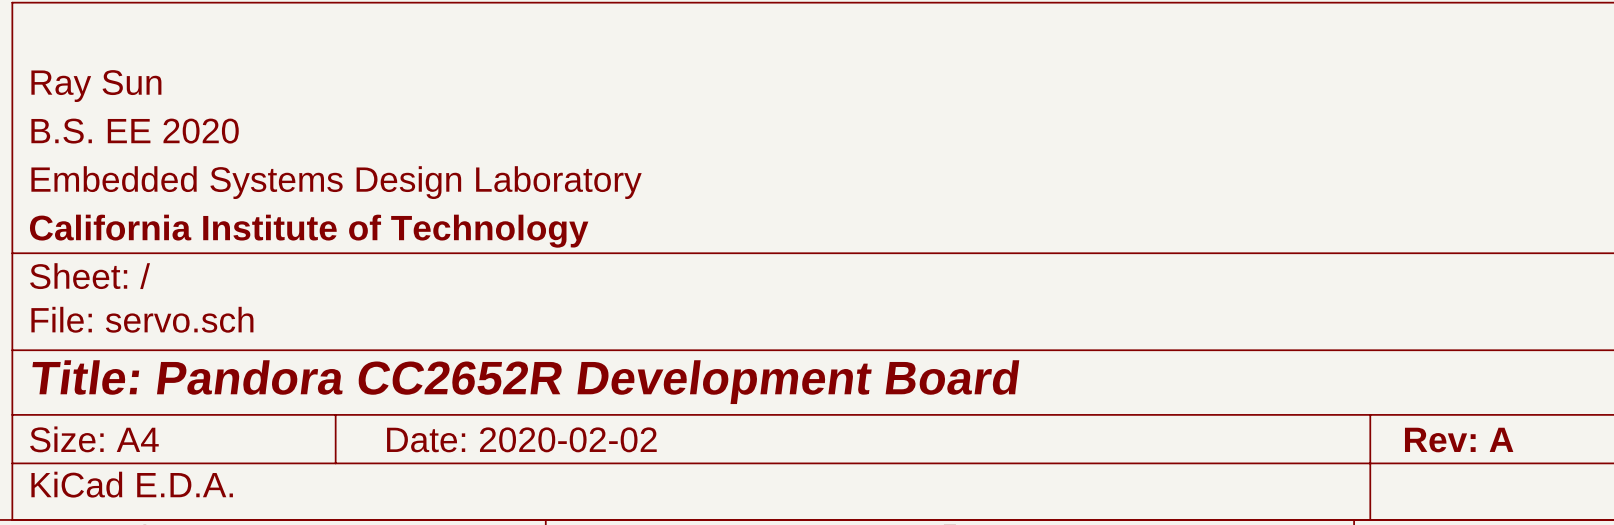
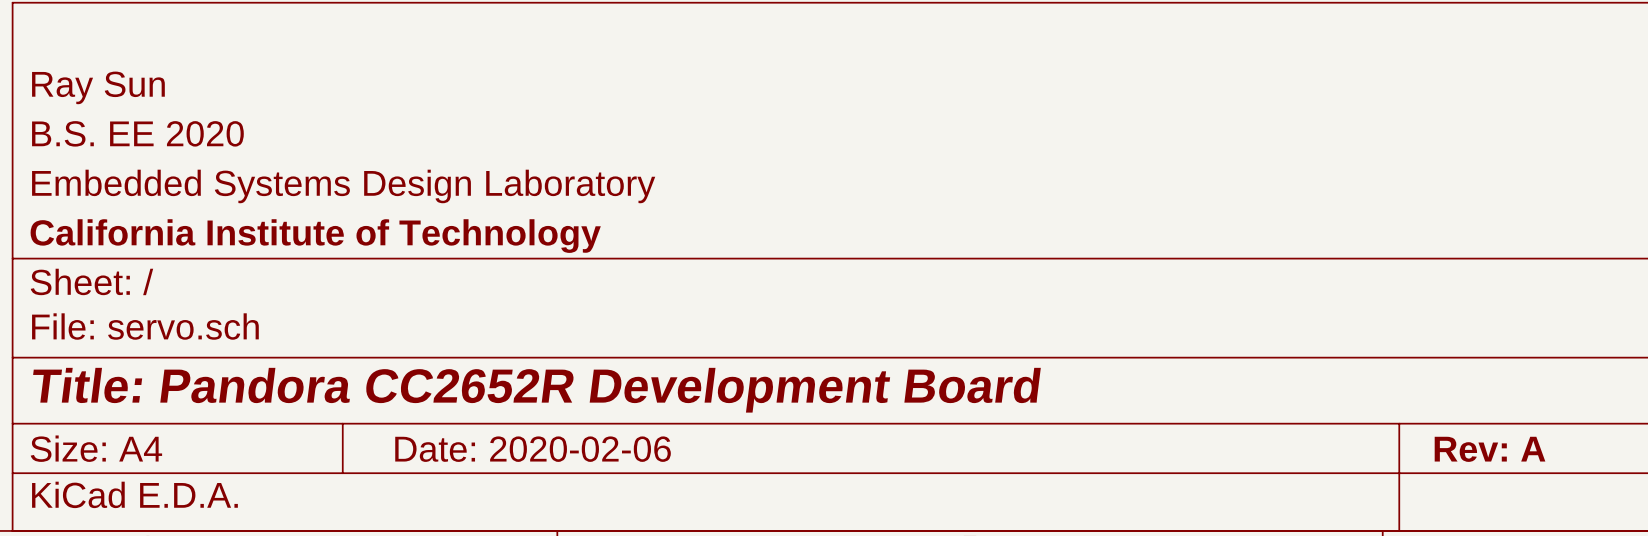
title block: Date: 2020-02-02 (521, 439) -> Date: 2020-02-06 (533, 449)

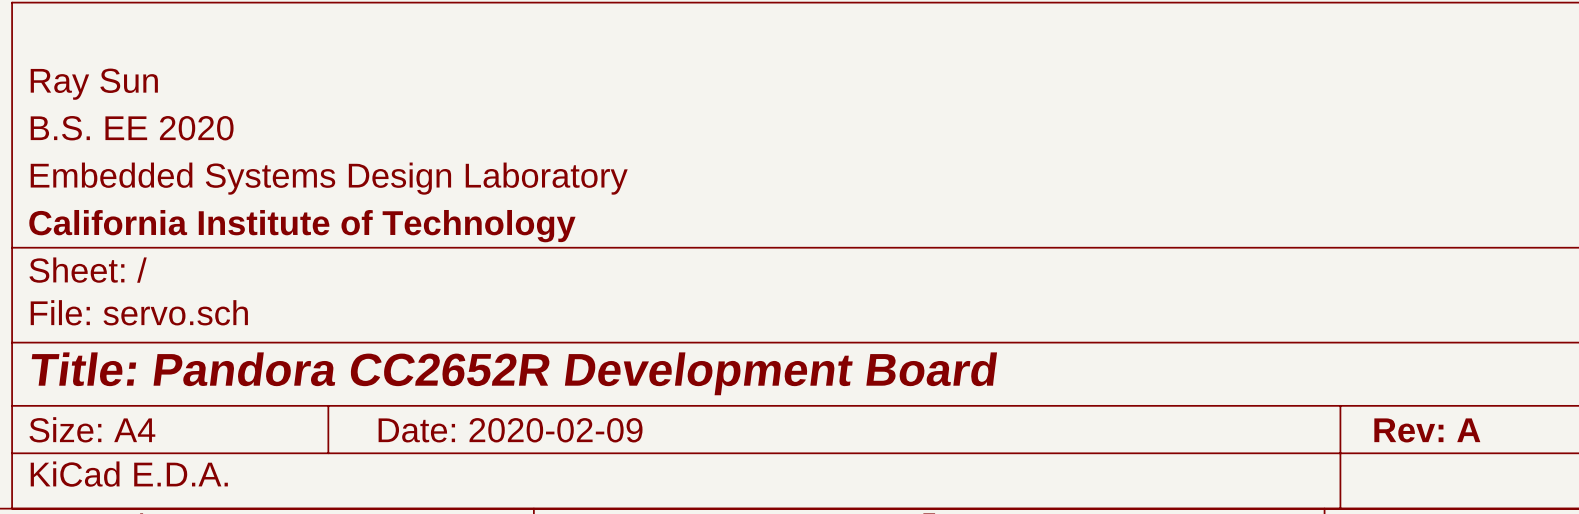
title block: Date: 2020-02-06 (533, 449) -> Date: 2020-02-09 (510, 430)

